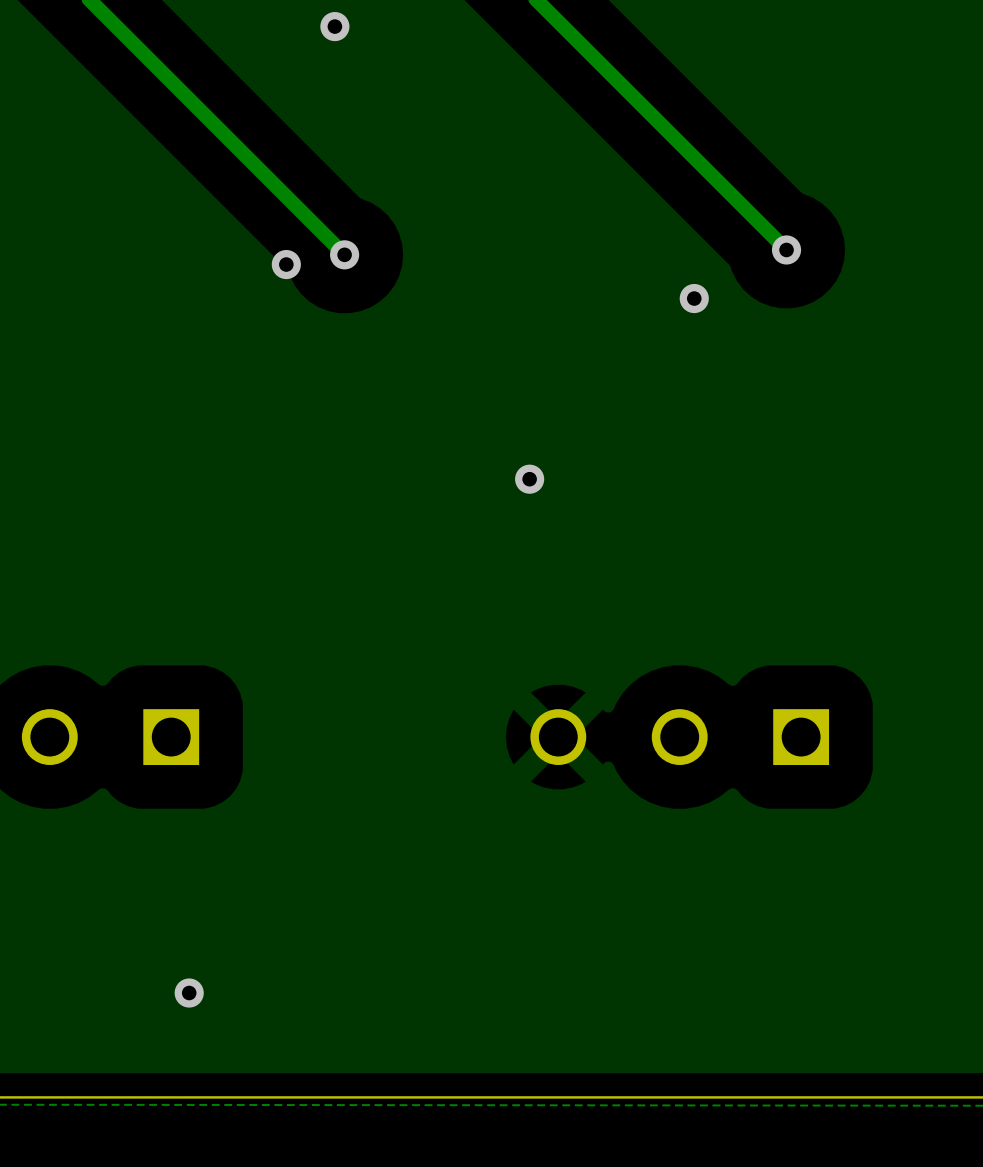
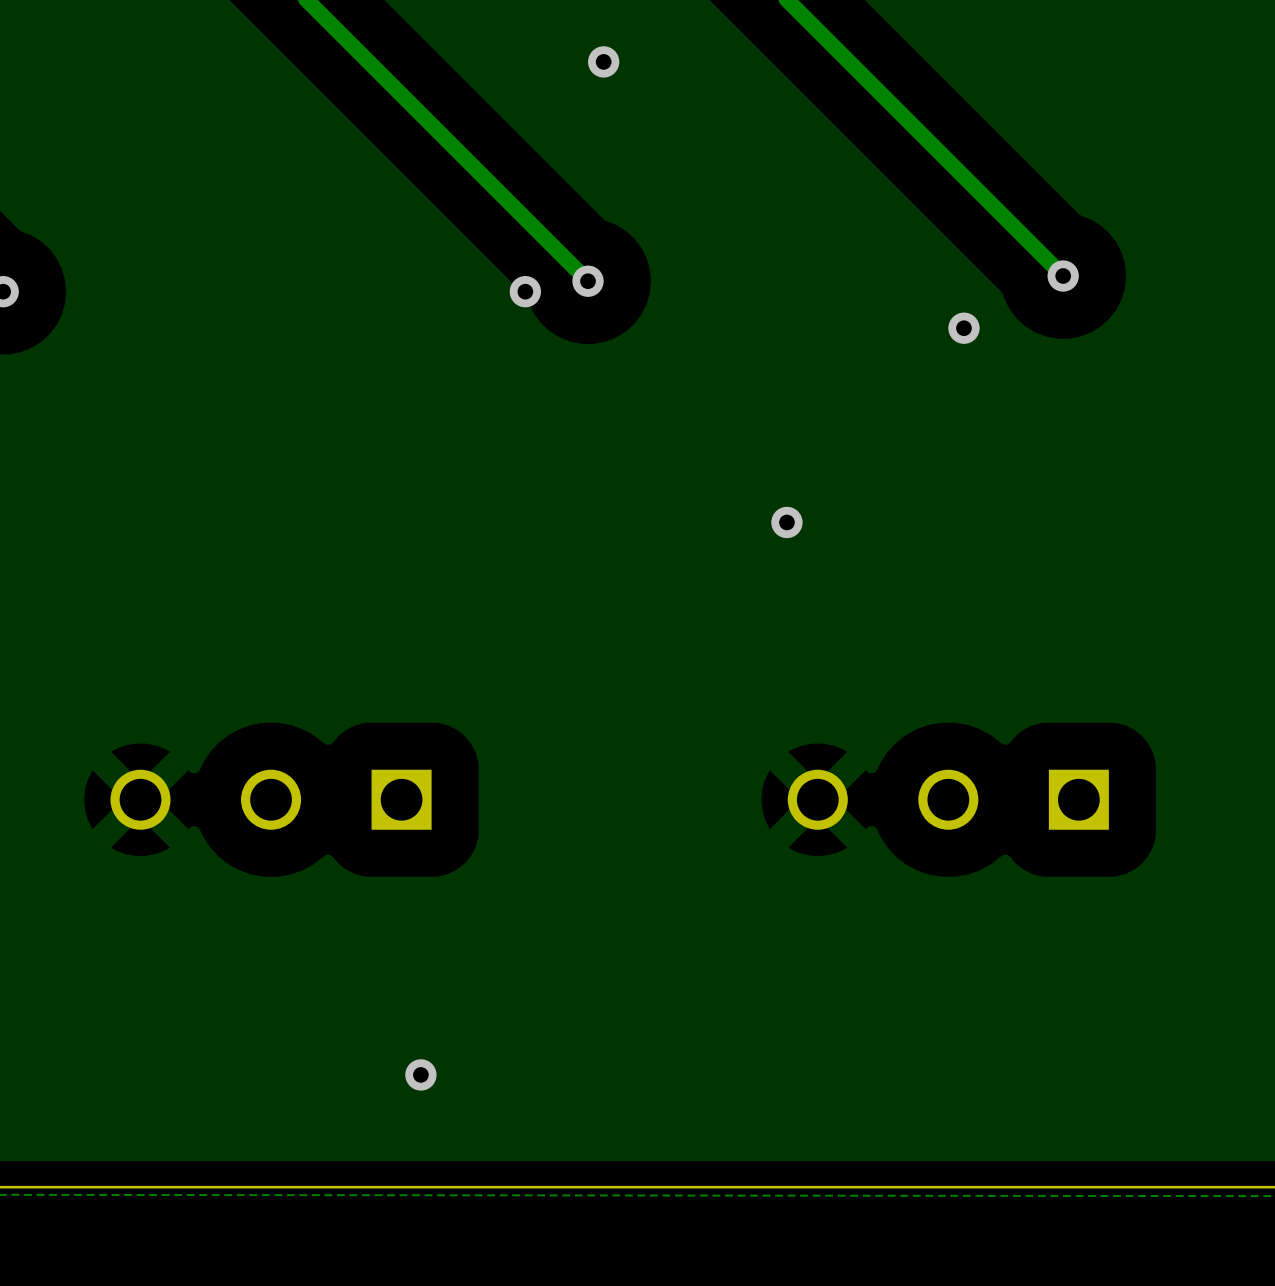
via position: (334, 26) -> (603, 61)

